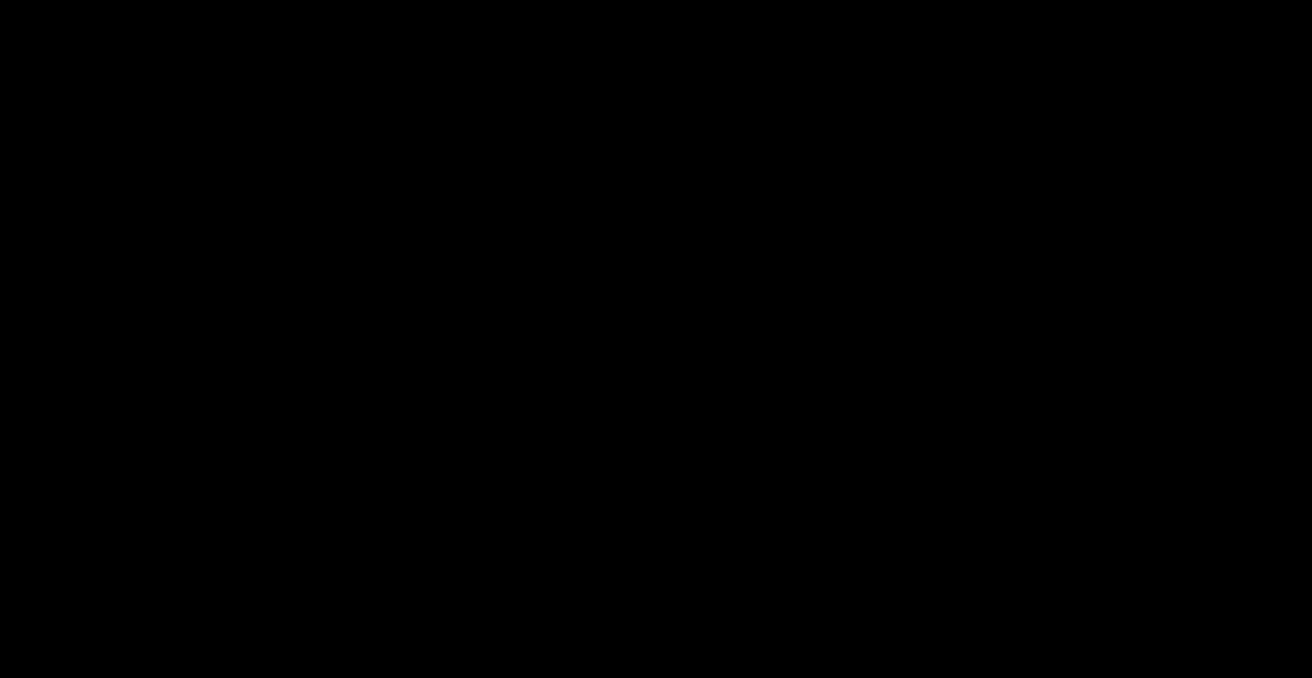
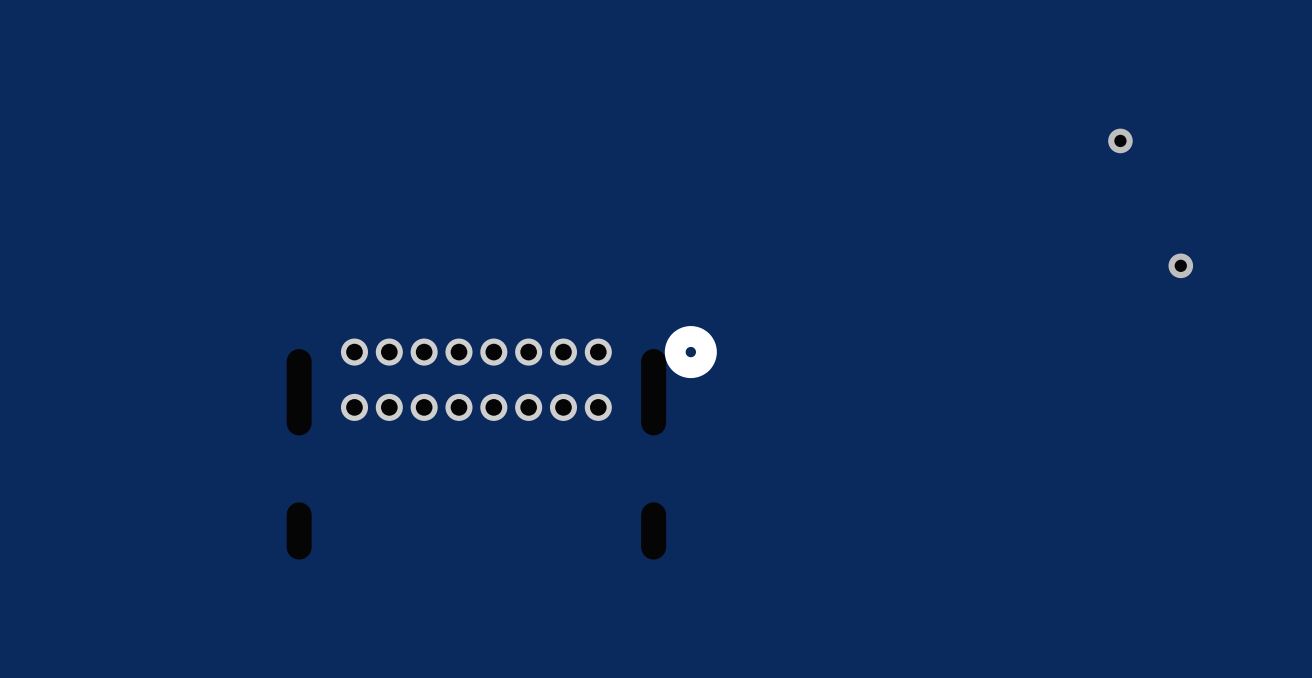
via: none -> (1120, 140)
via: none -> (1180, 265)
part: none -> (501, 442)

